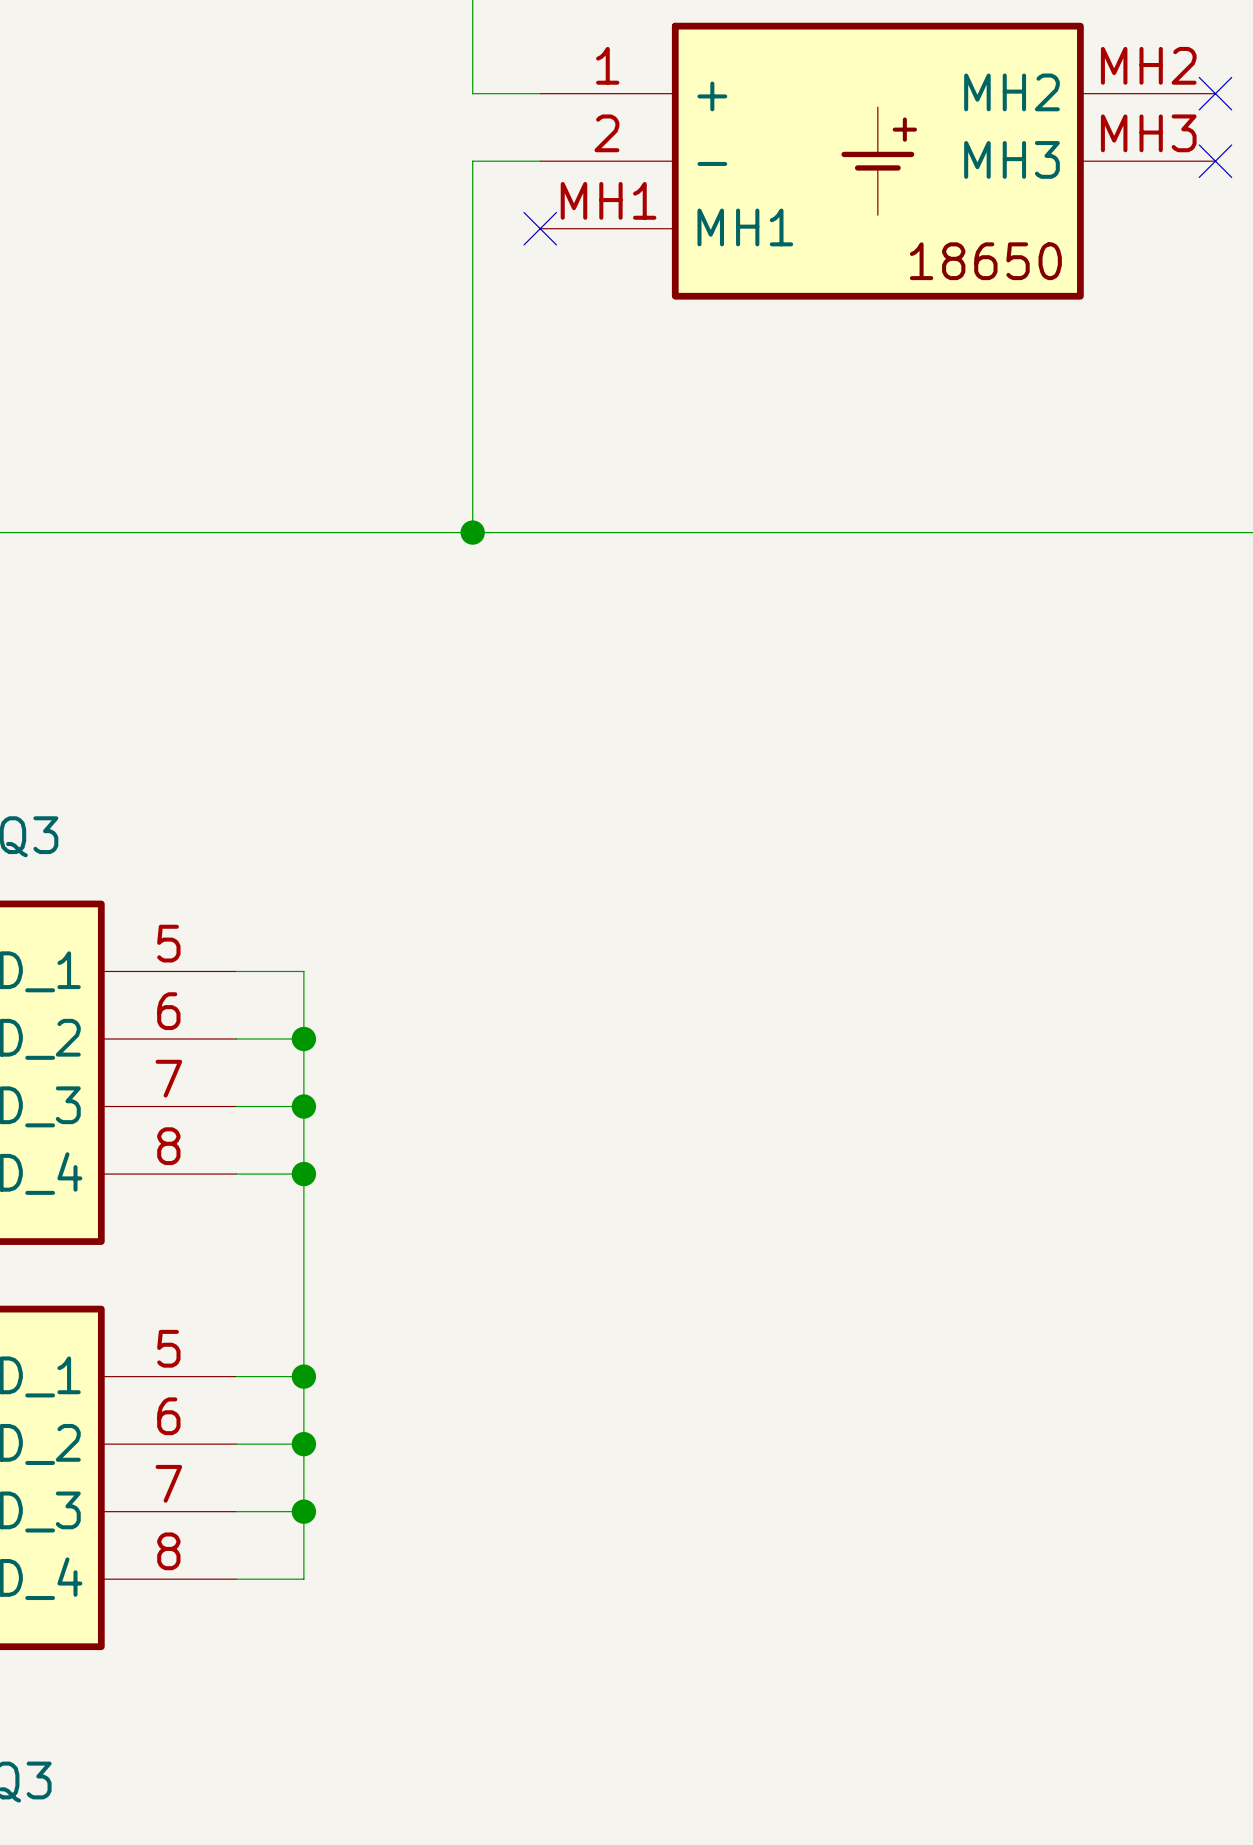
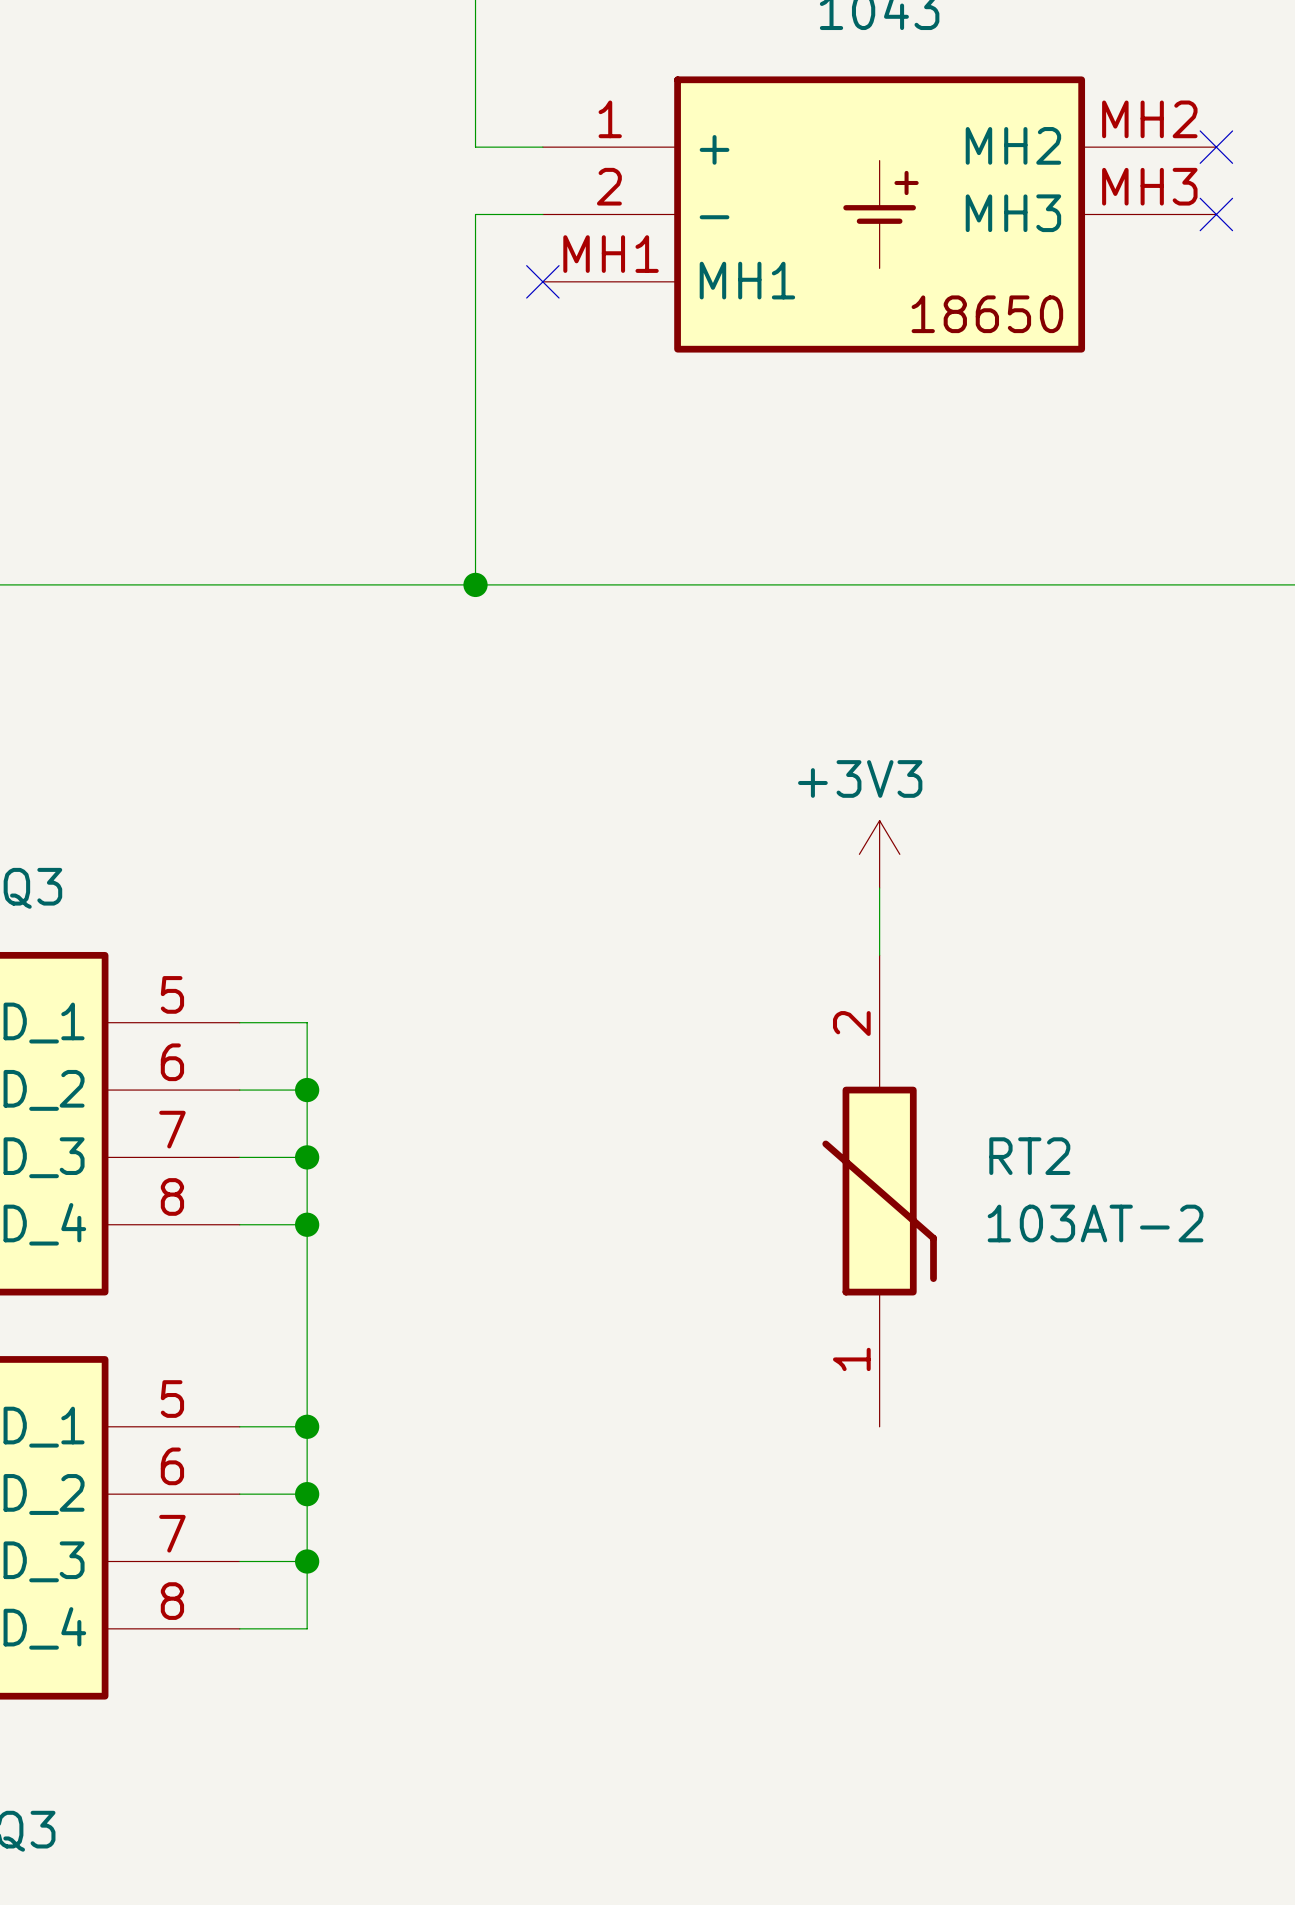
power symbol: none -> +3V3 (879, 854)
wire: none -> (879, 887) (879, 955)
RT2: none -> 103AT-2 (879, 1191)

